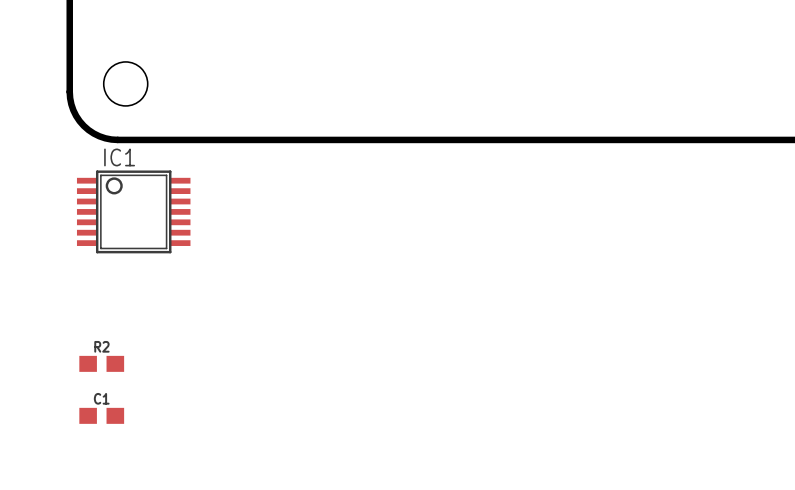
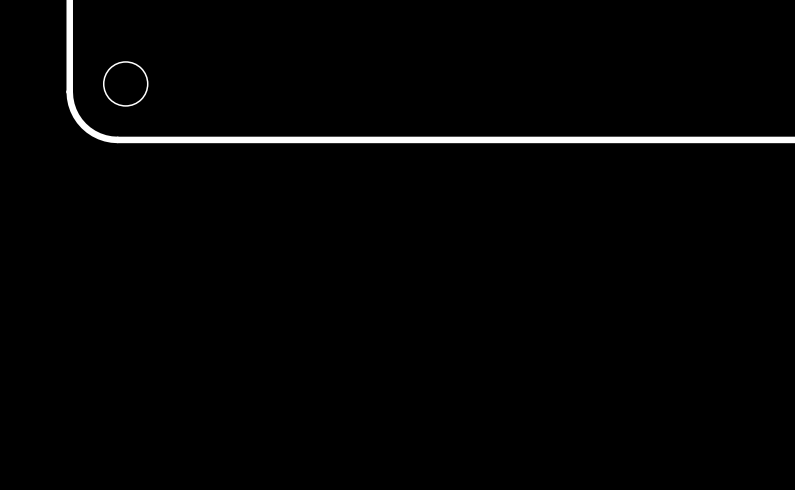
IC1: (133, 211) -> none
R2: (101, 363) -> none
C1: (101, 415) -> none

